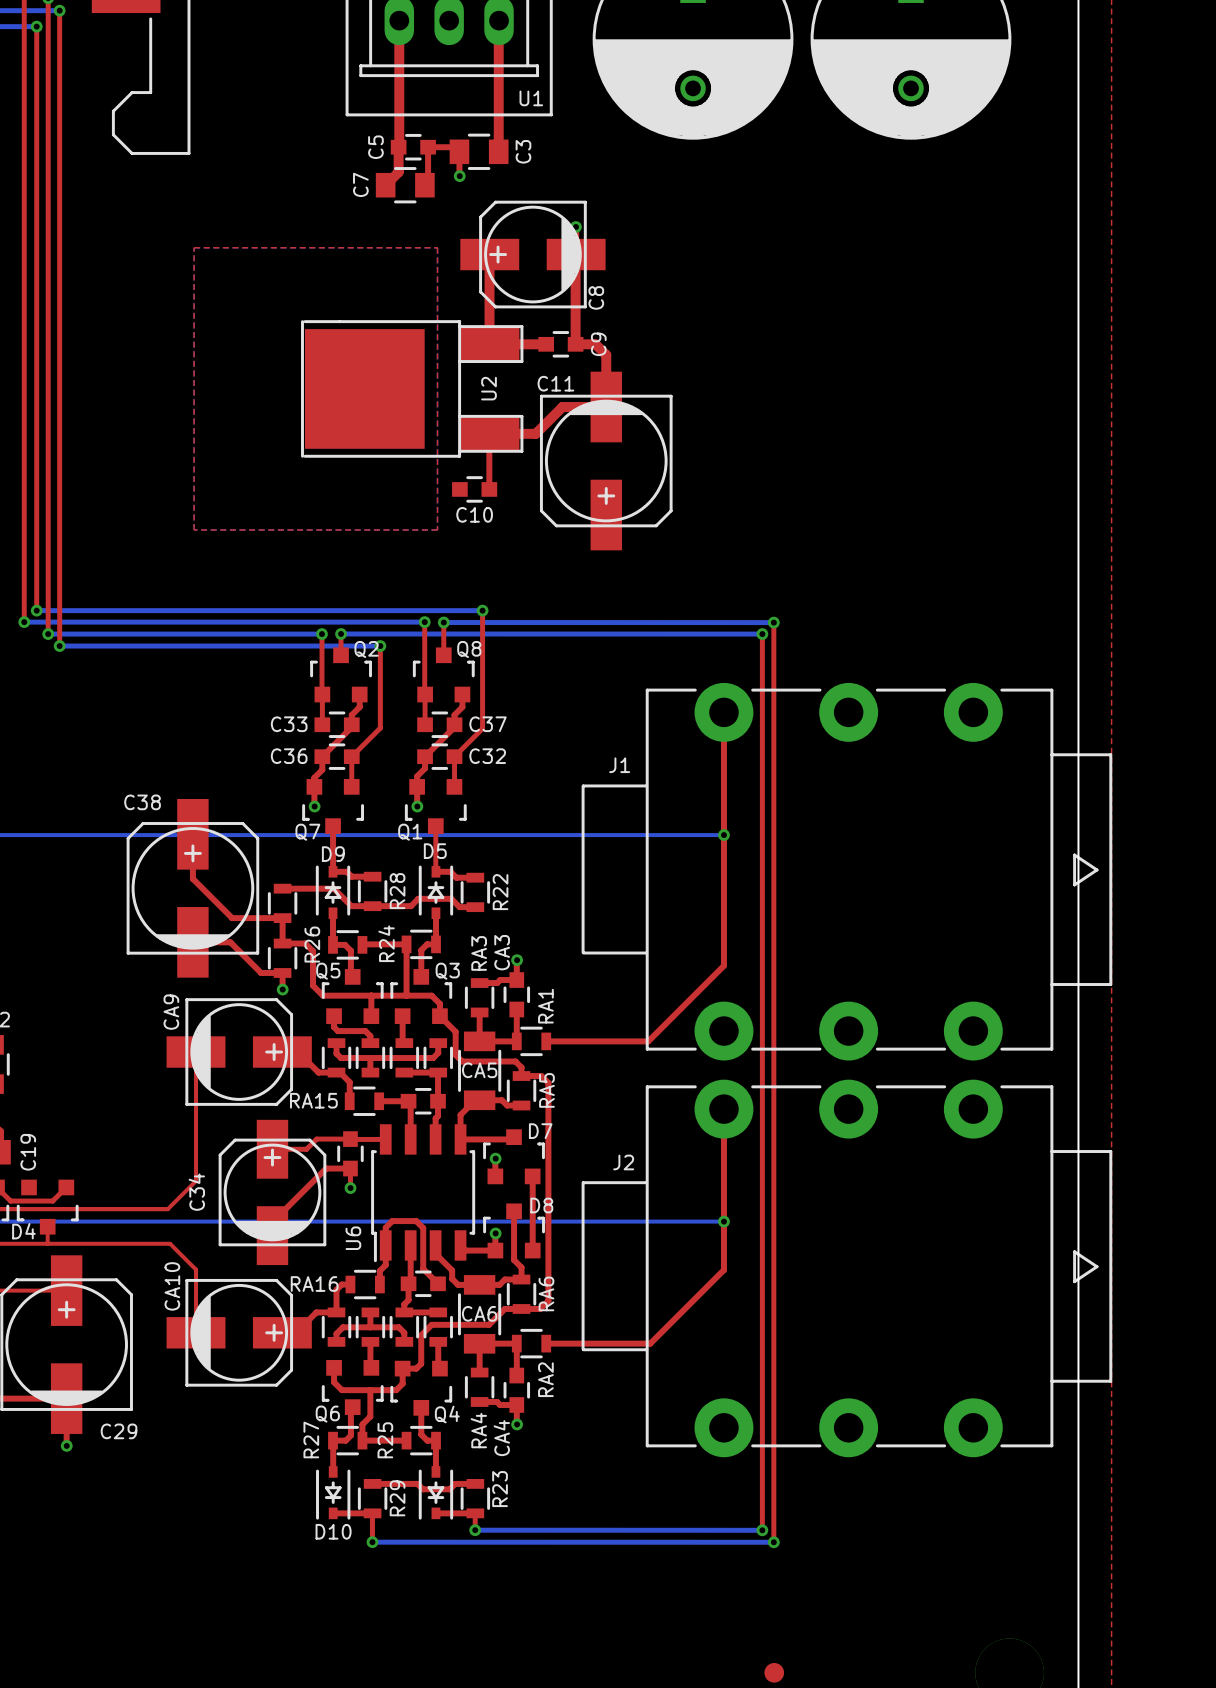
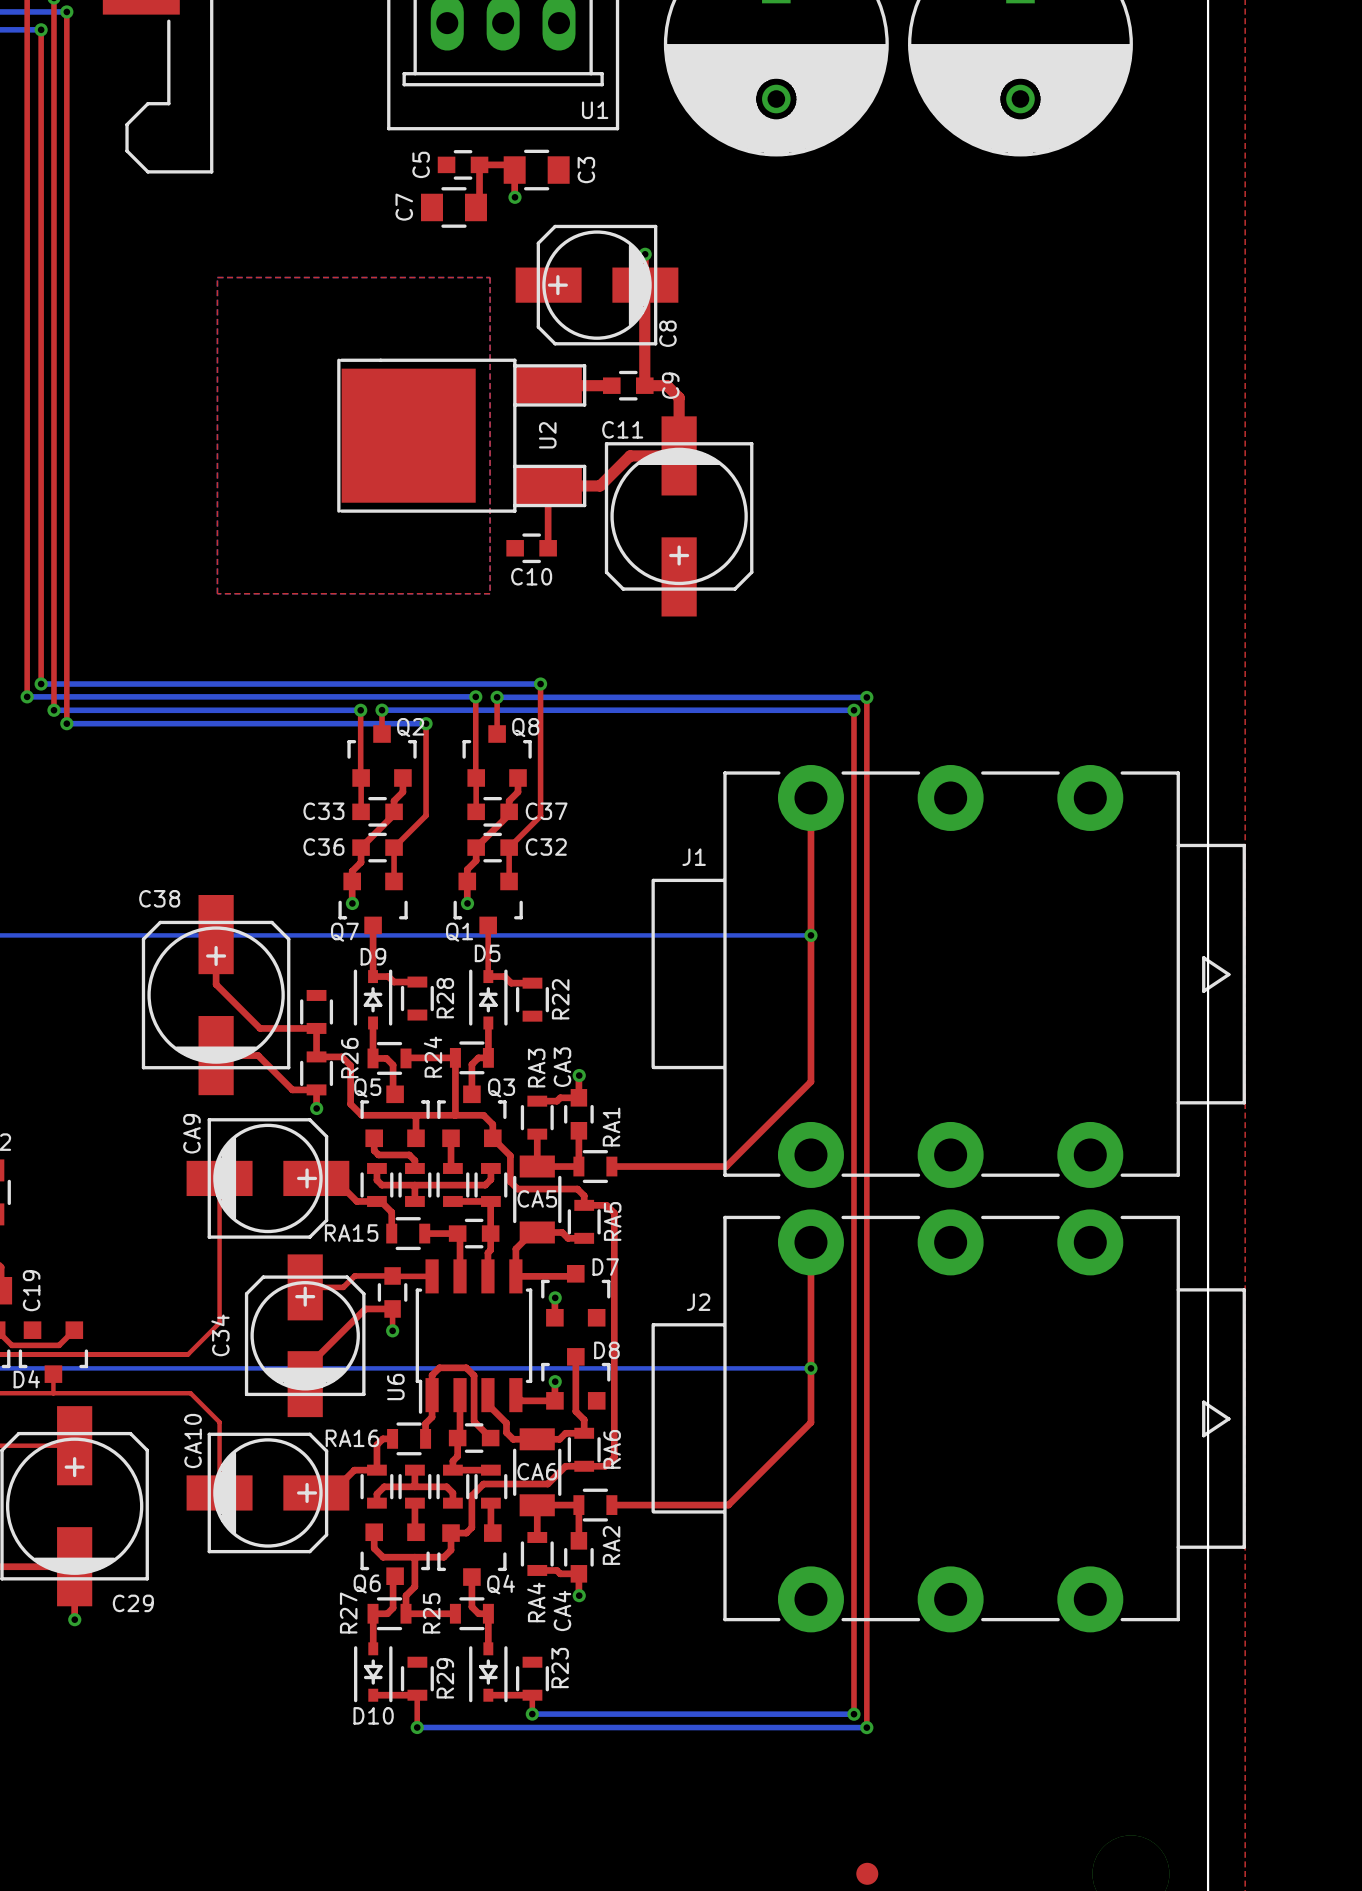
top track: (399, 20) (398, 172) (385, 185) -> none
top track: (499, 20) (498, 151) -> none
top track: (489, 254) (489, 344) -> none
top track: (282, 888) (333, 888) (351, 906) (411, 906) (418, 898) (451, 898) (459, 907) (475, 907) -> none
top track: (532, 1176) (532, 1250) -> none
top track: (372, 1483) (417, 1483) (422, 1489) (449, 1489) (455, 1483) (475, 1483) -> none

